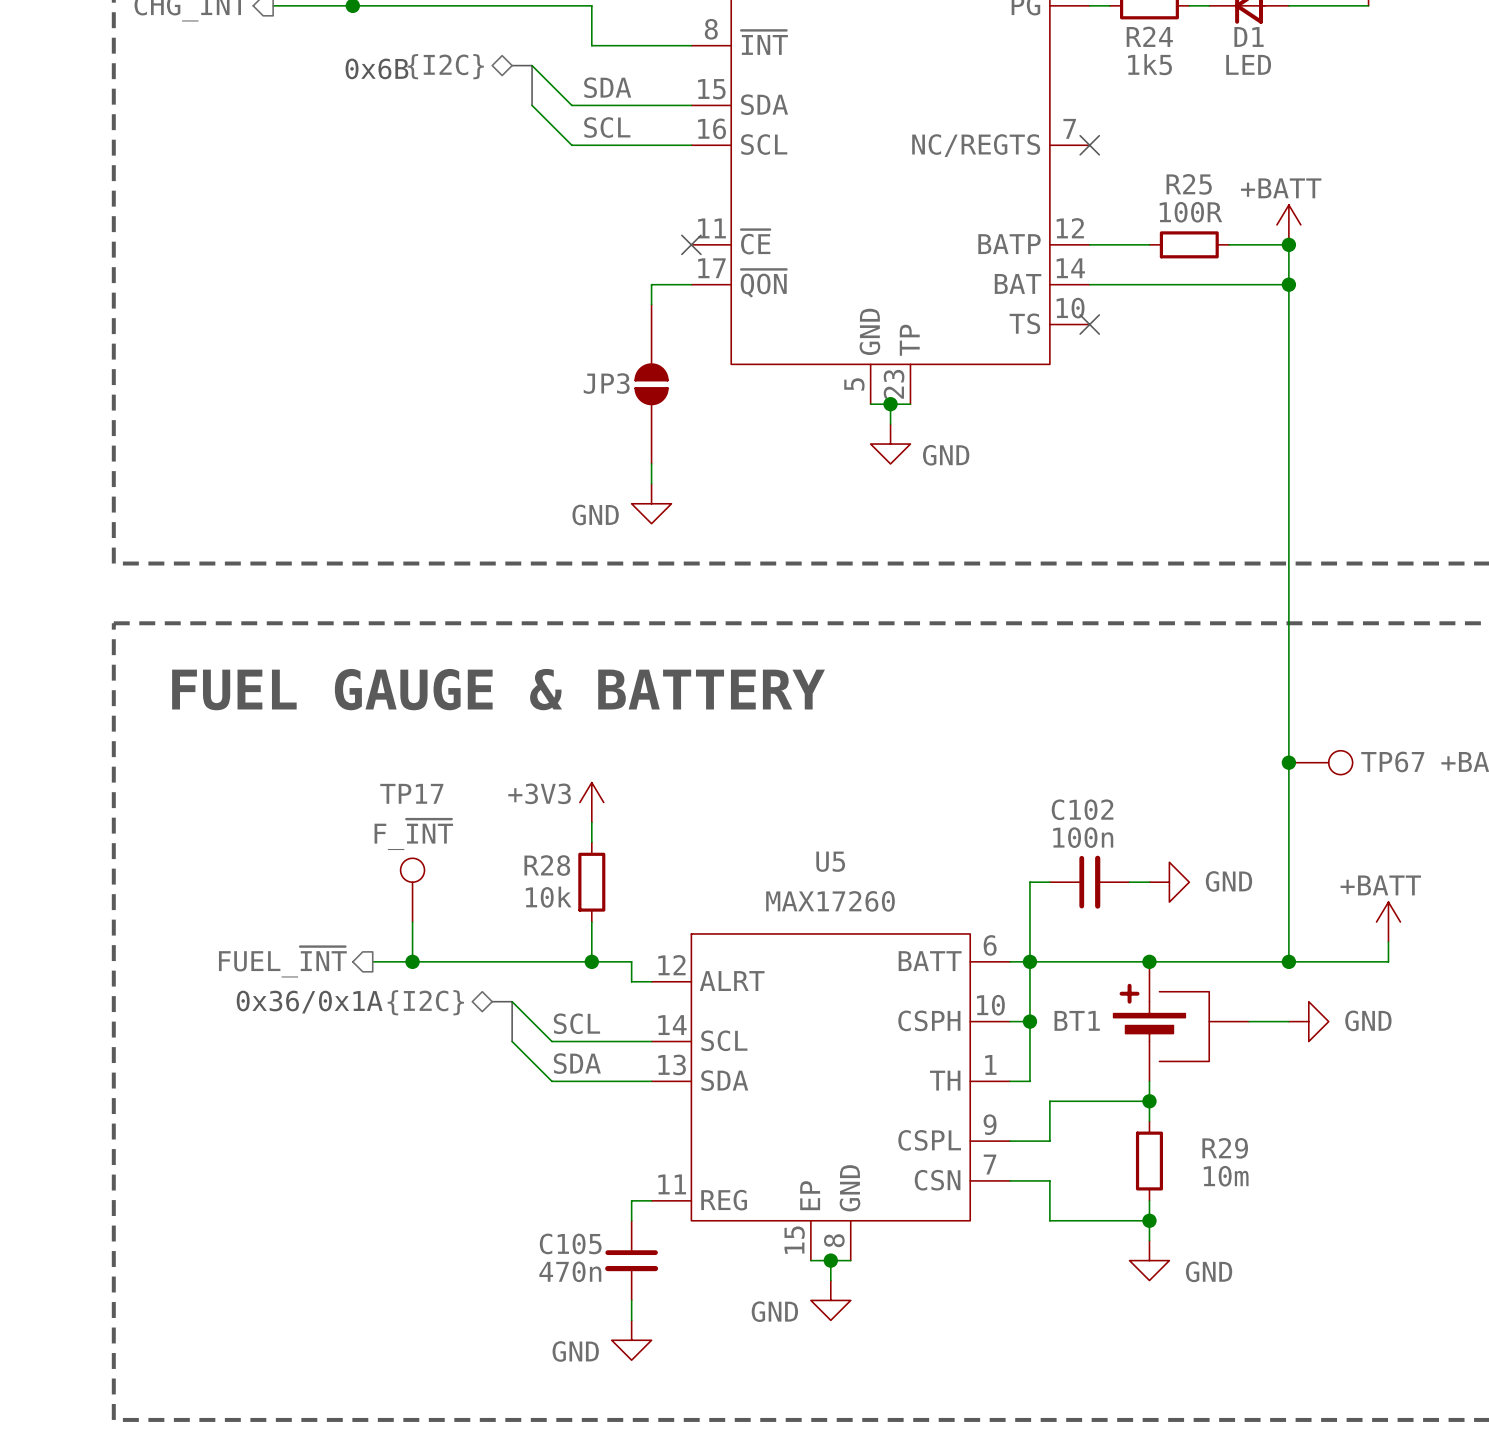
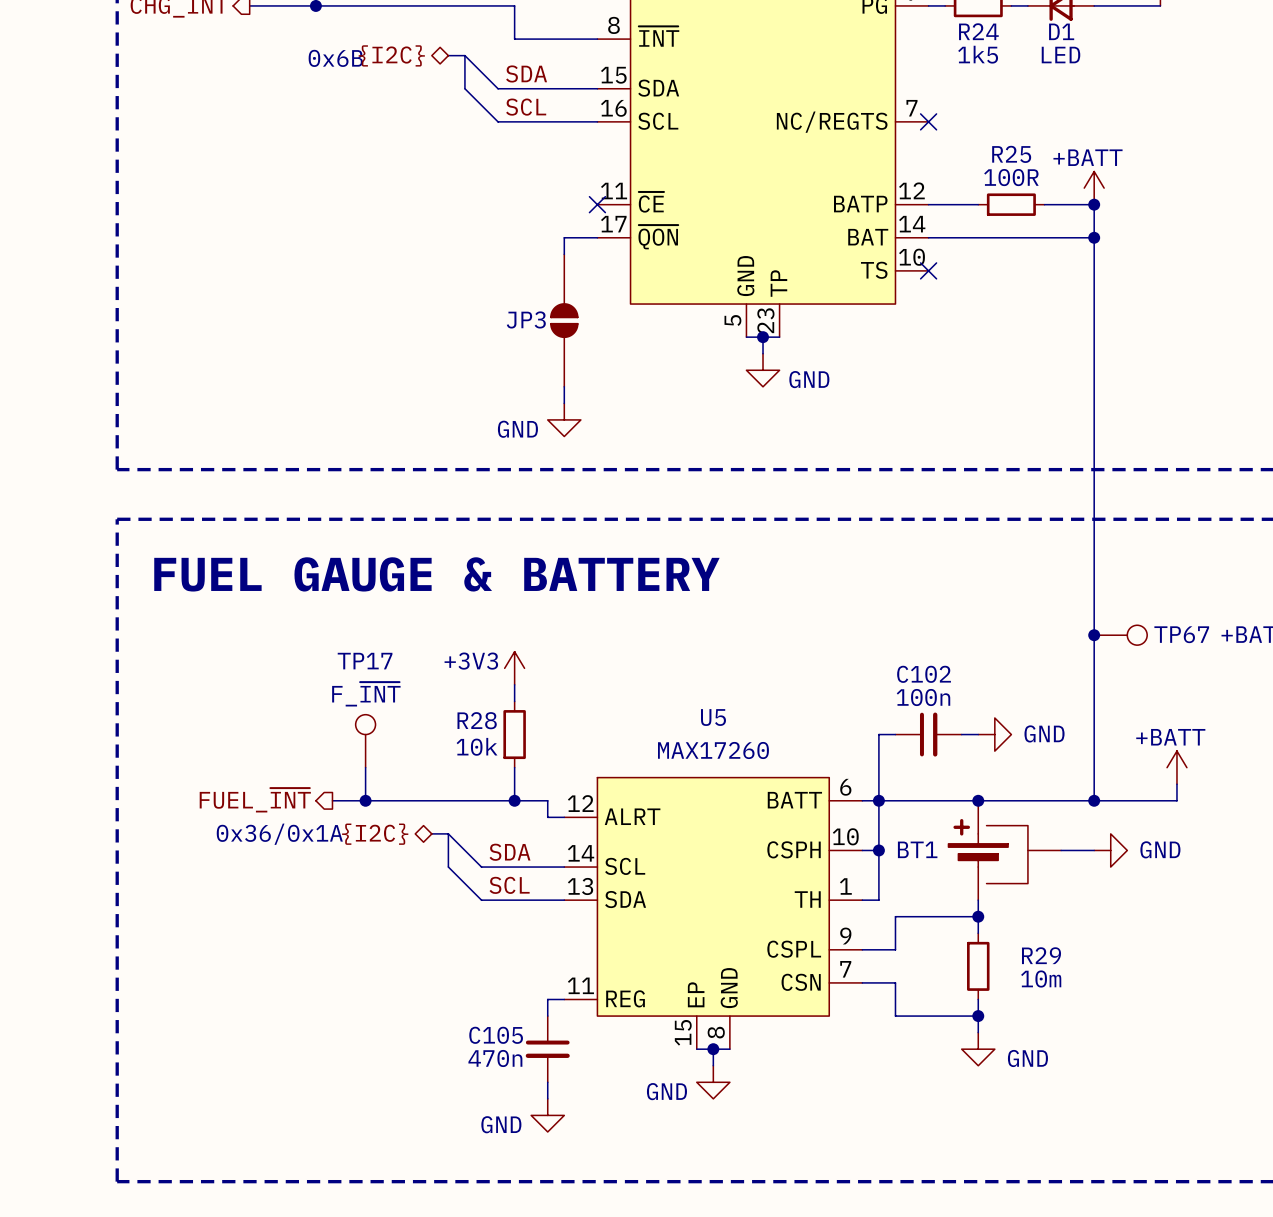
label position: SCL (576, 1023) -> SCL (509, 885)
label position: SDA (577, 1063) -> SDA (510, 852)

